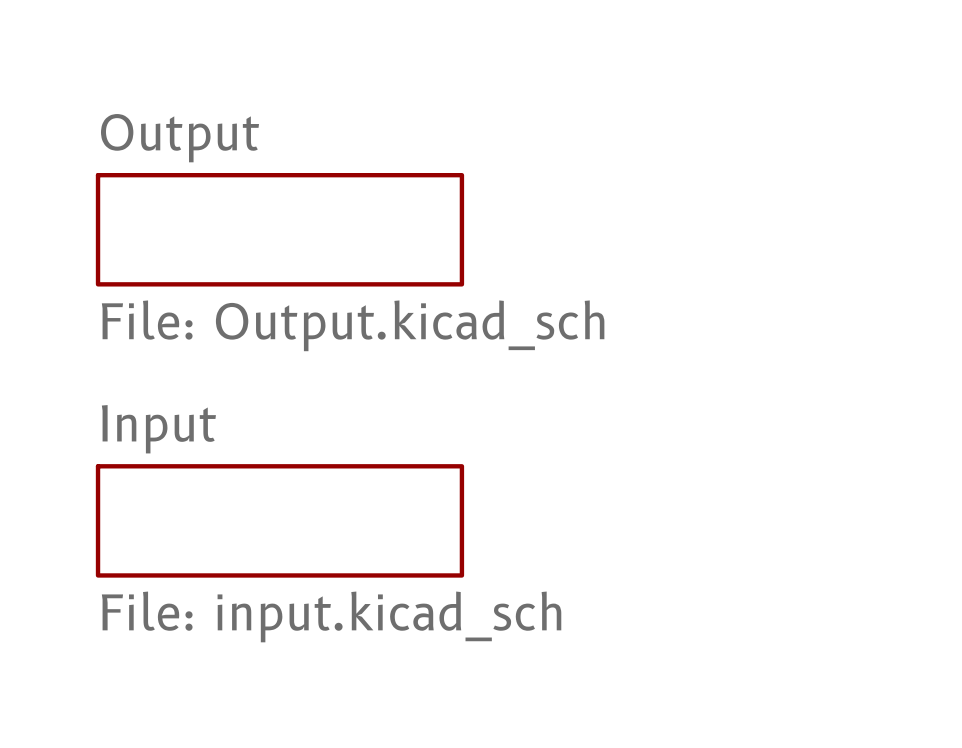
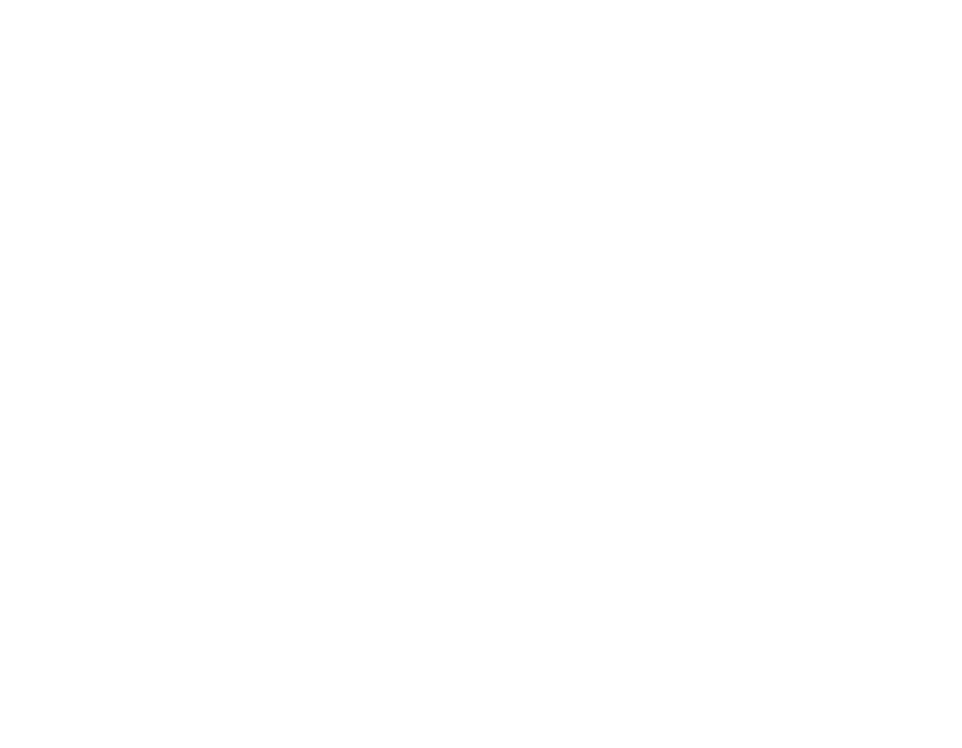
sheet Output: File: Output.kicad_sch (279, 229) -> none
sheet Input: File: input.kicad_sch (279, 520) -> none

